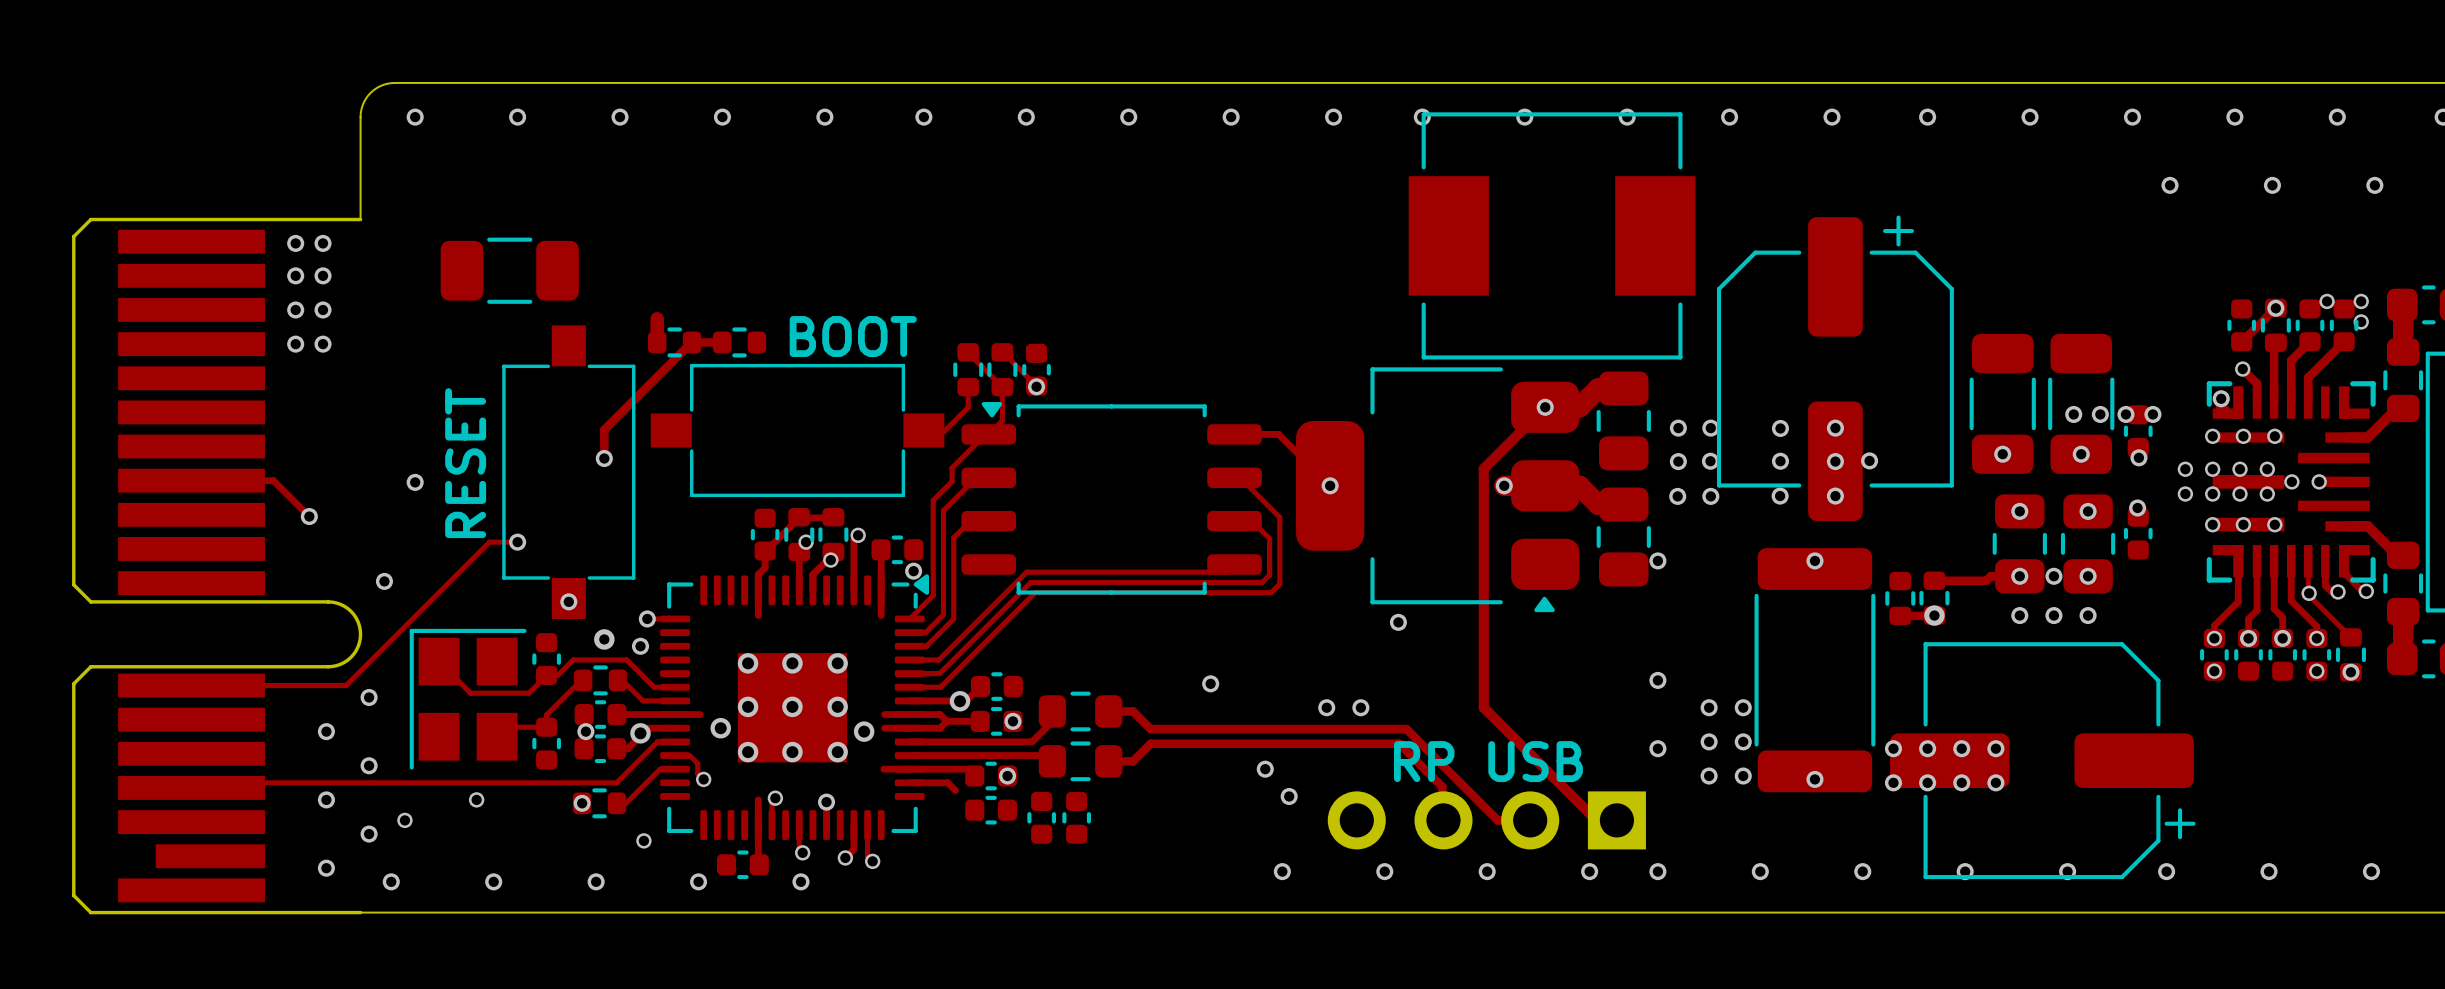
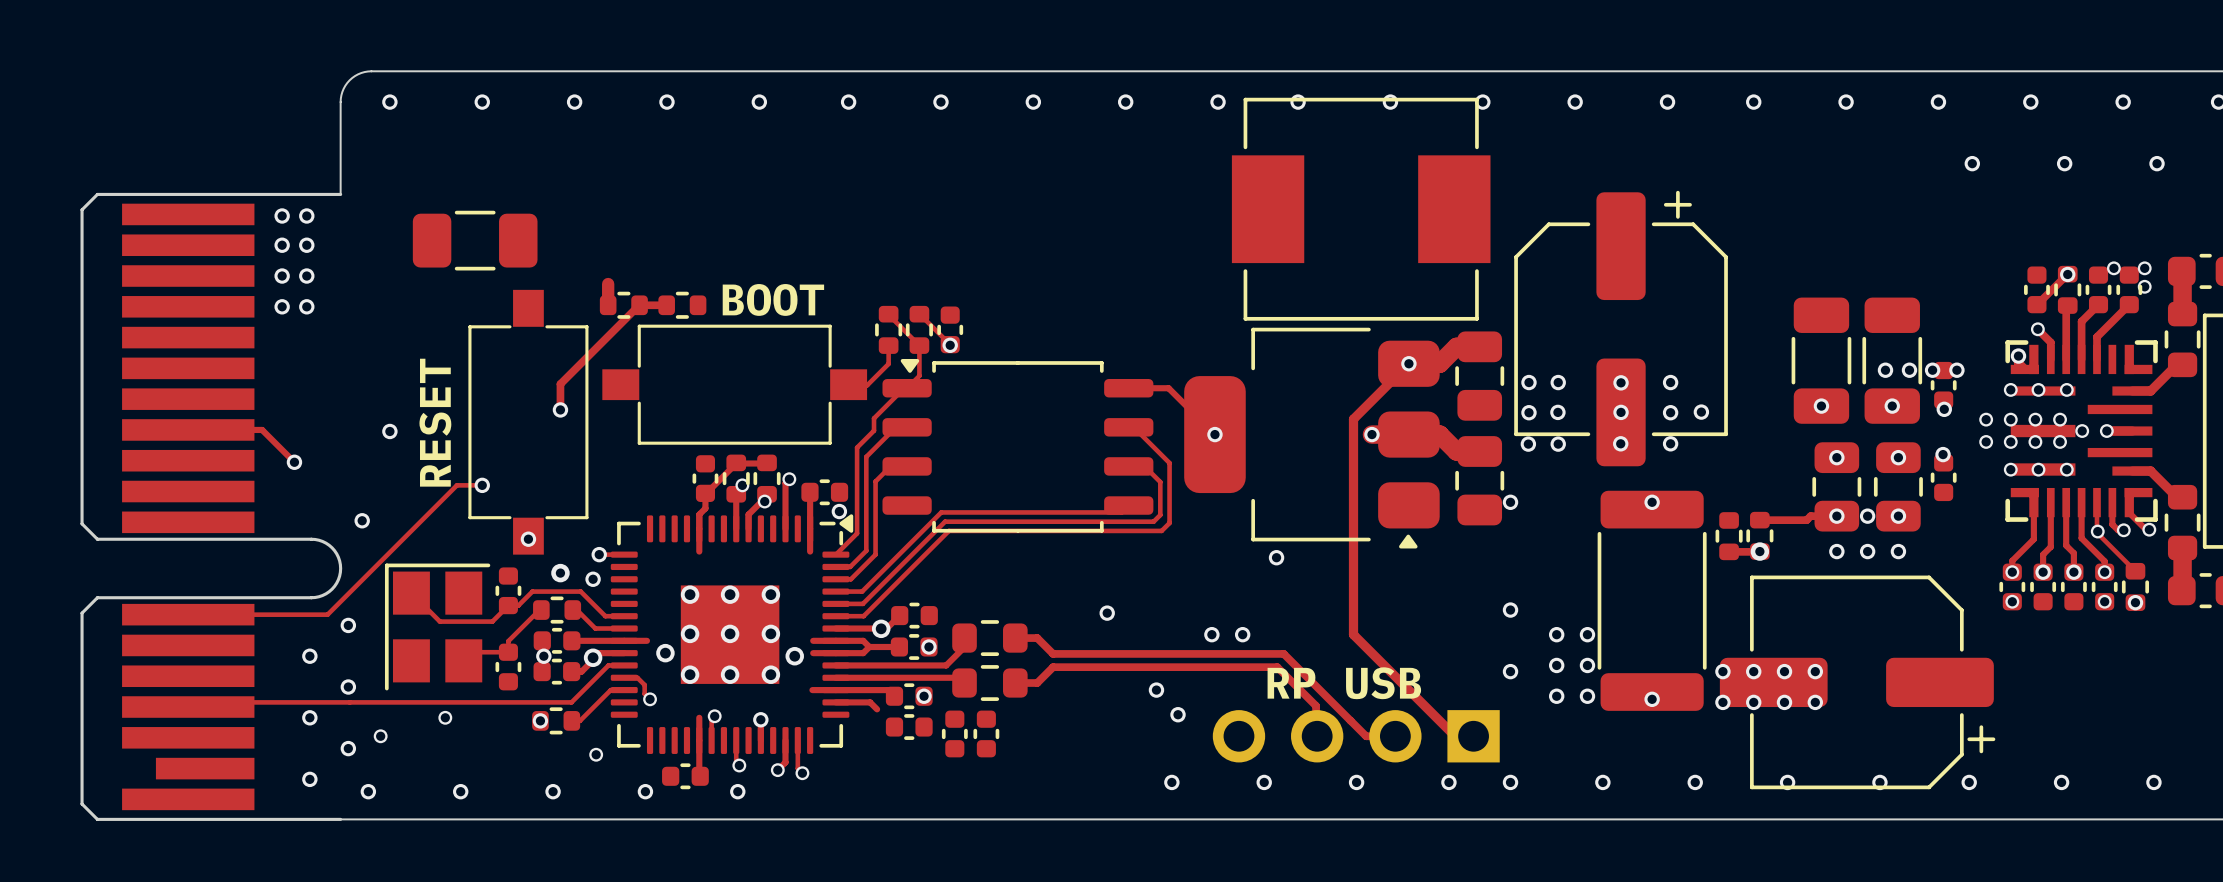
part position: (1552, 235) -> (1361, 209)
part position: (1835, 368) -> (1621, 328)

